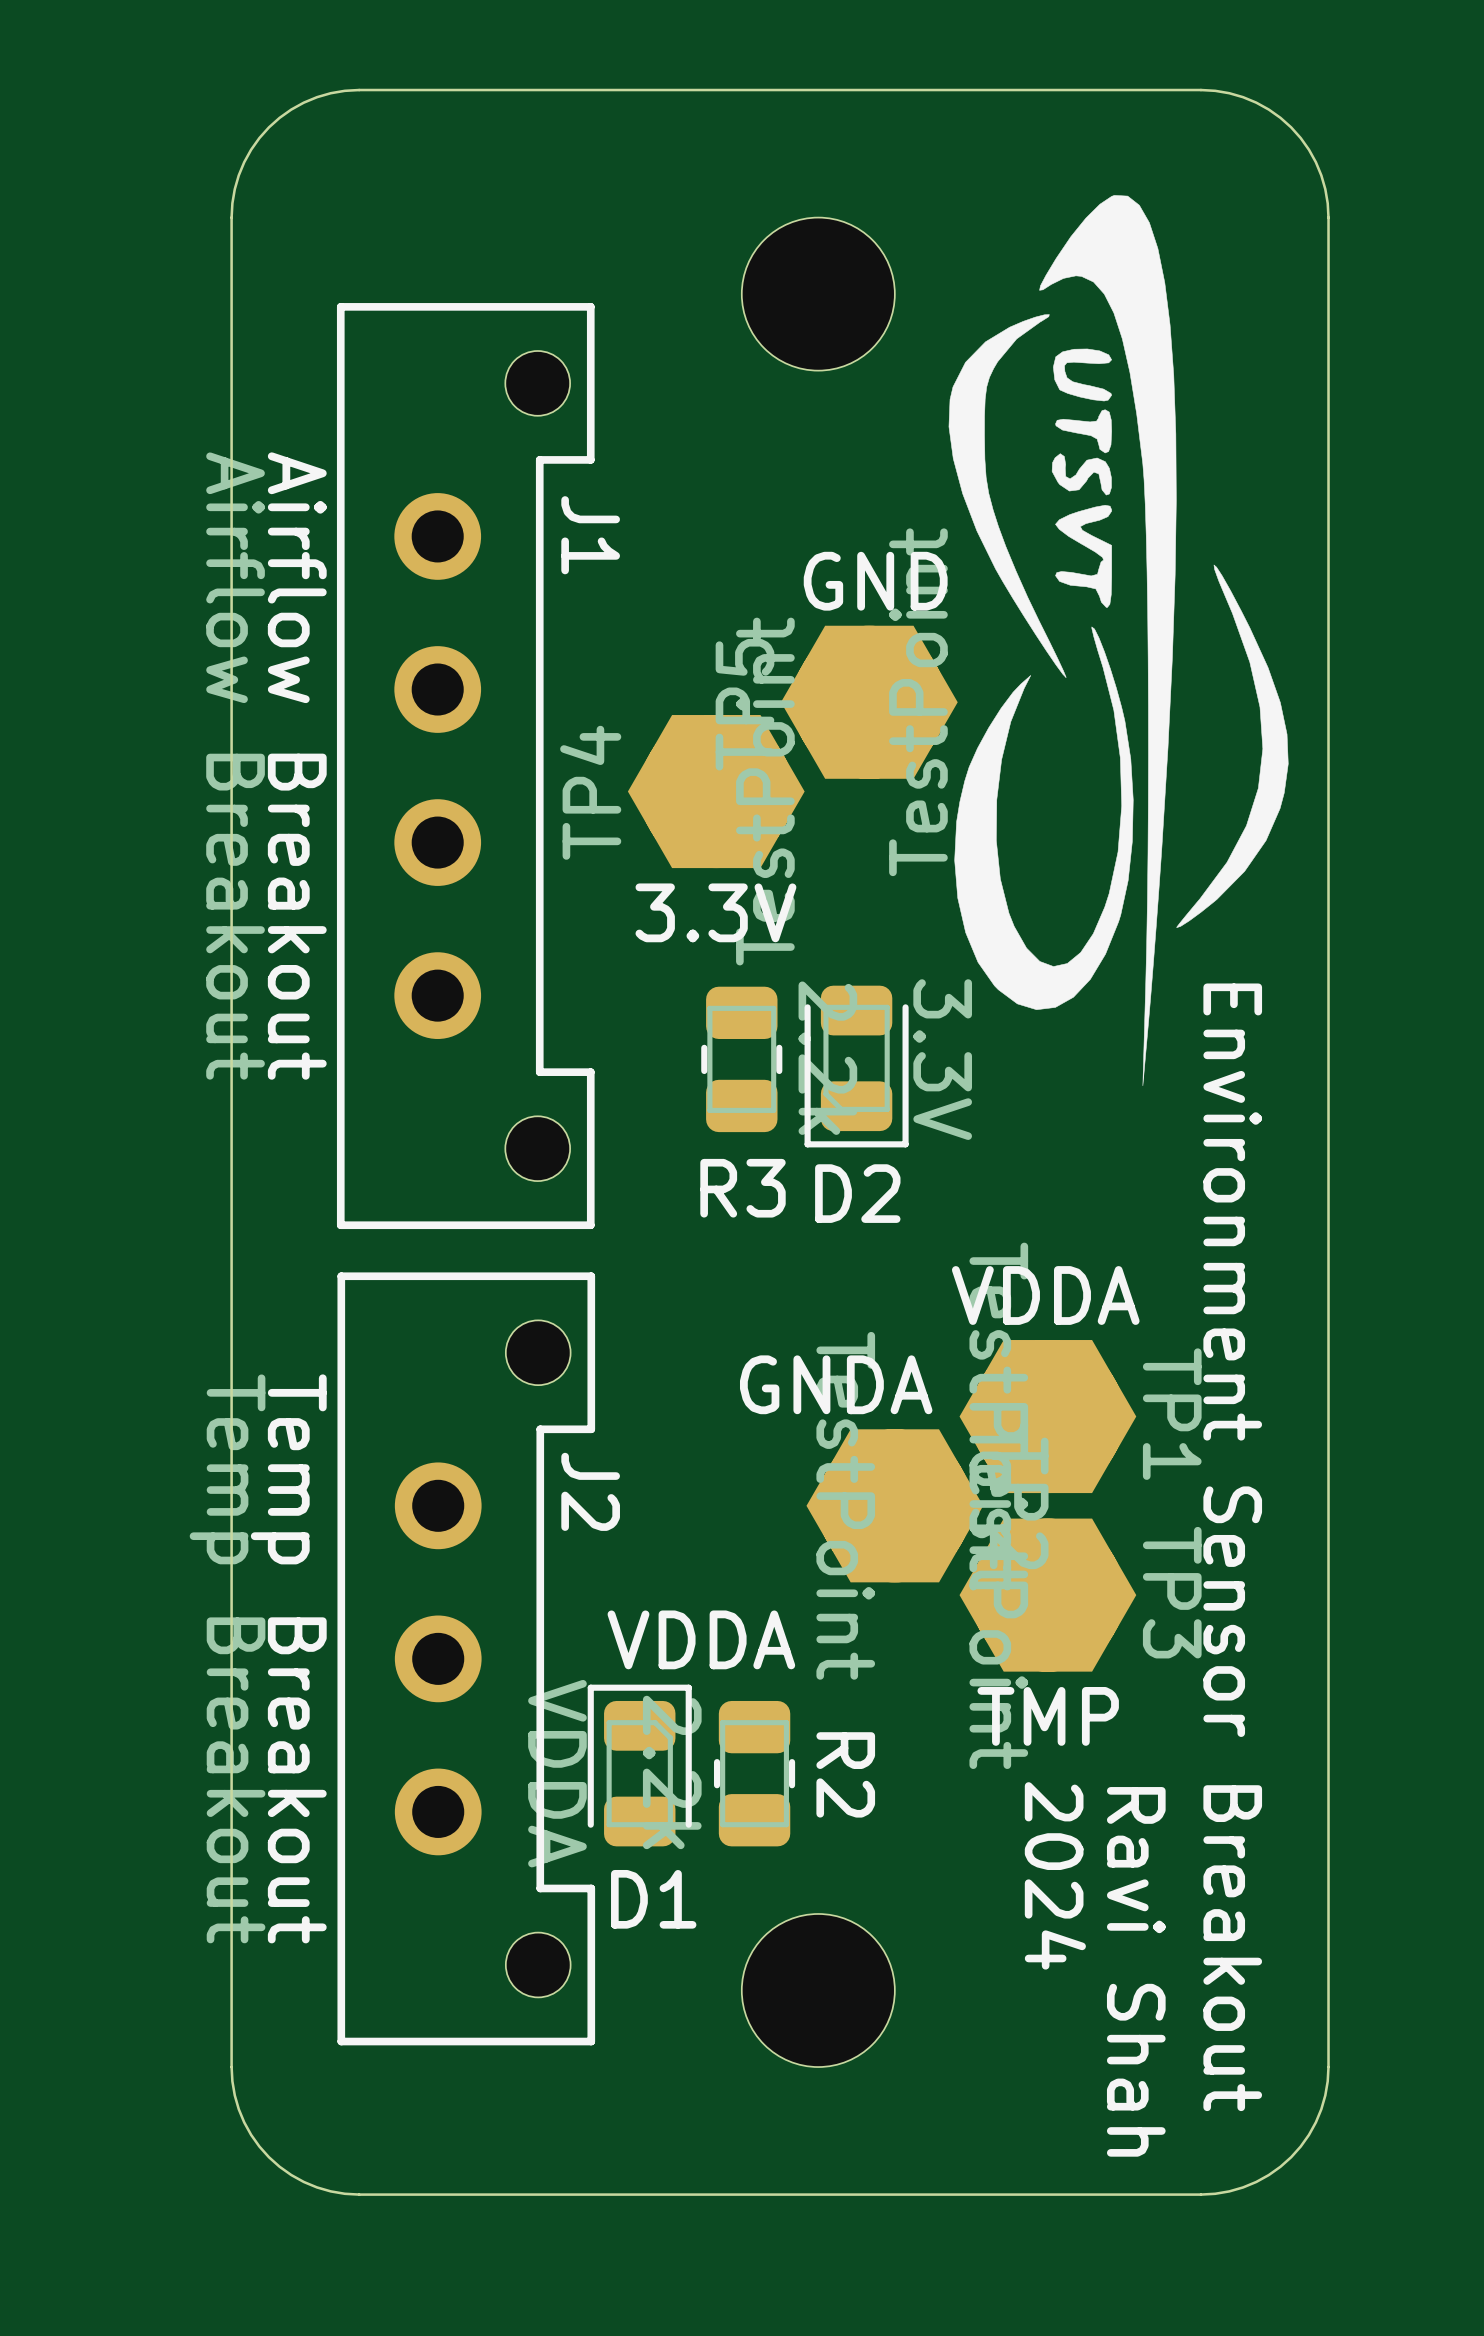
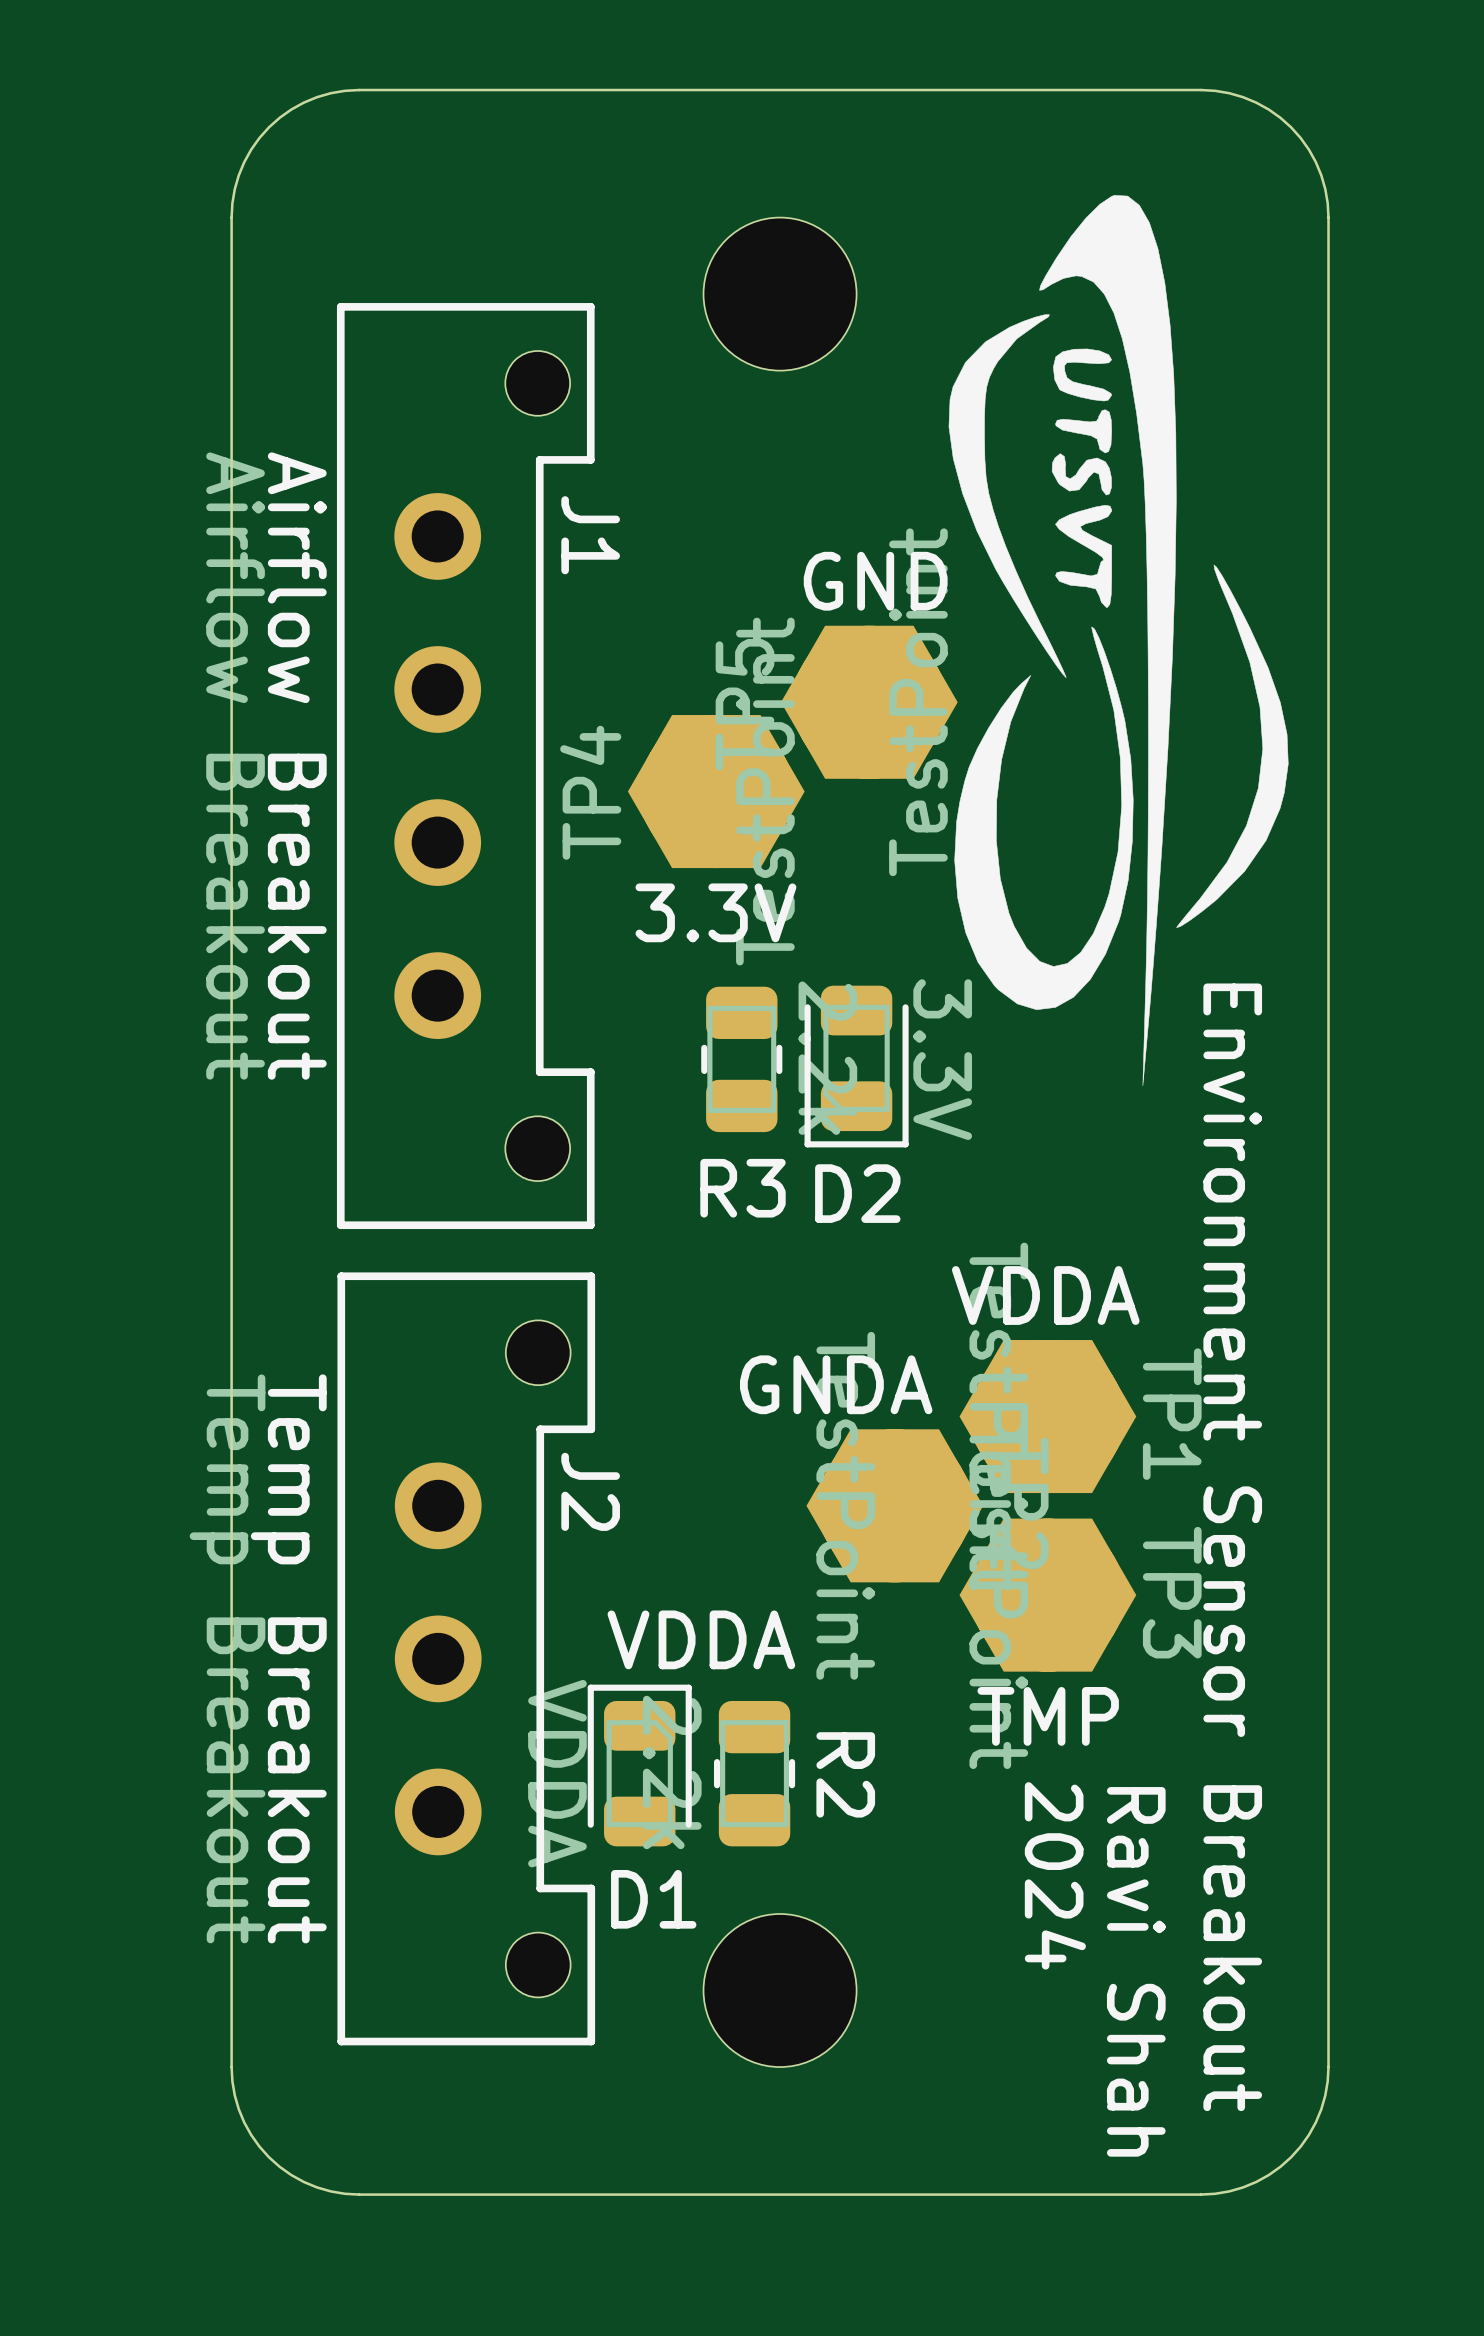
part position: (818, 294) -> (780, 294)
part position: (818, 1990) -> (780, 1990)

